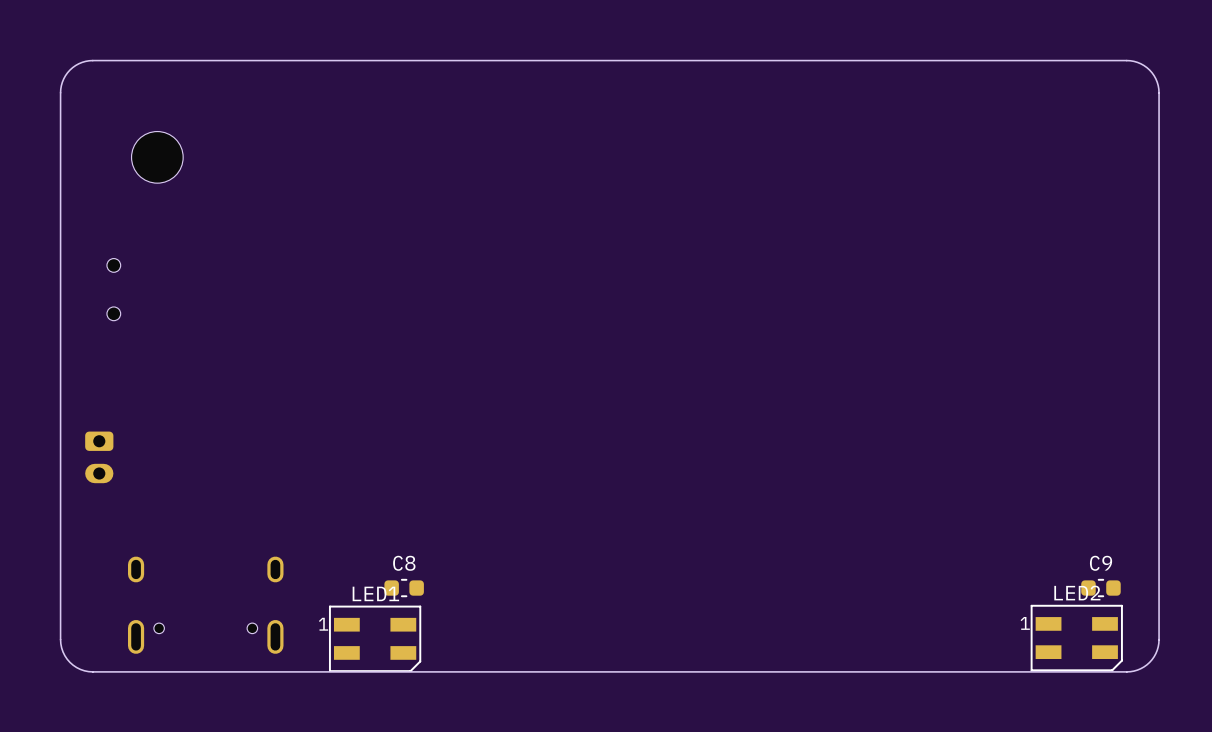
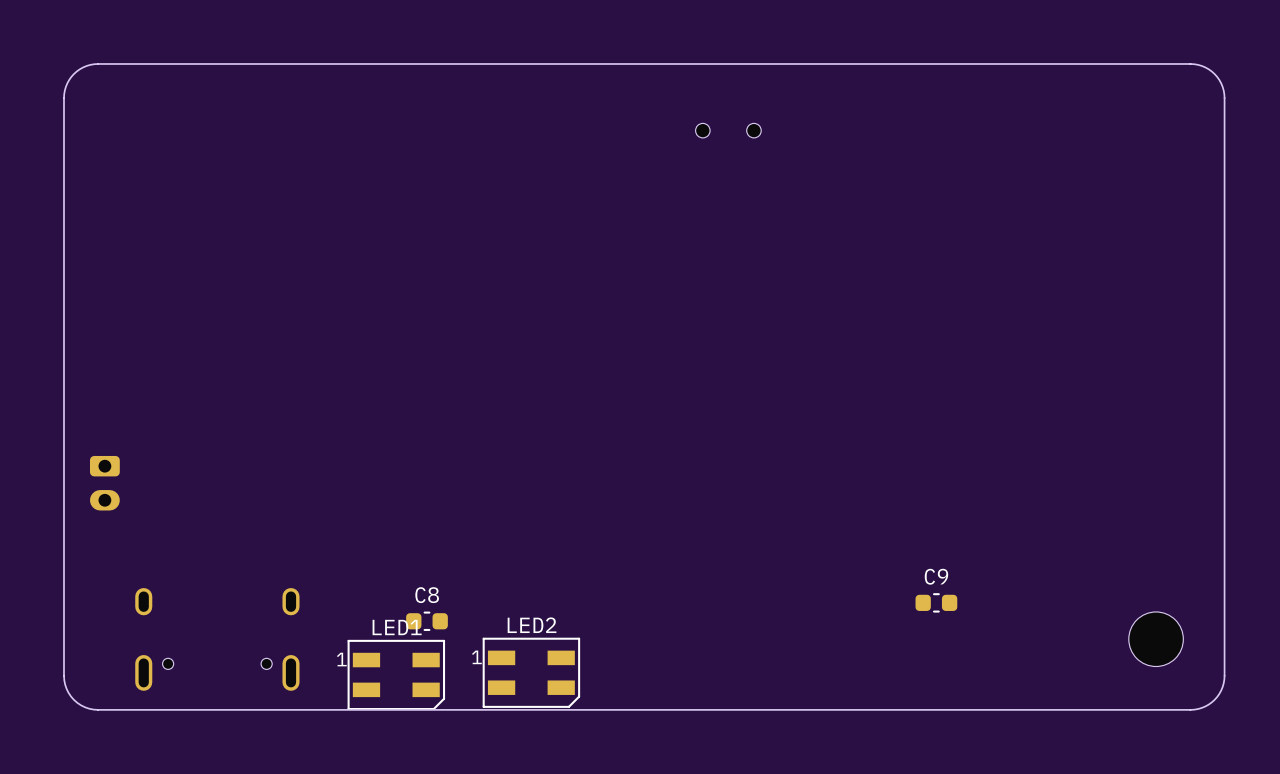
part: none -> (728, 130)
part: (157, 157) -> none
part: (113, 289) -> none
C9 position: (1100, 588) -> (936, 602)
part: none -> (1156, 639)
LED2 position: (1076, 638) -> (531, 672)

